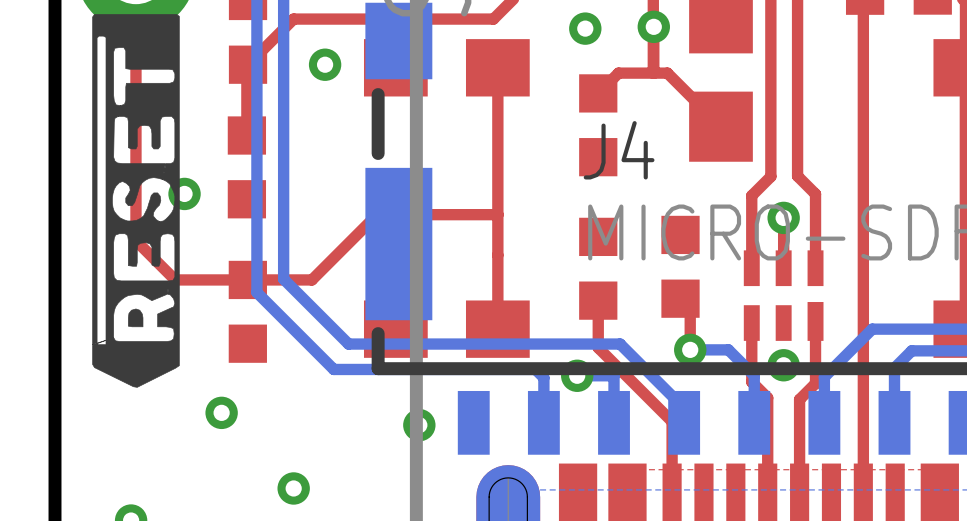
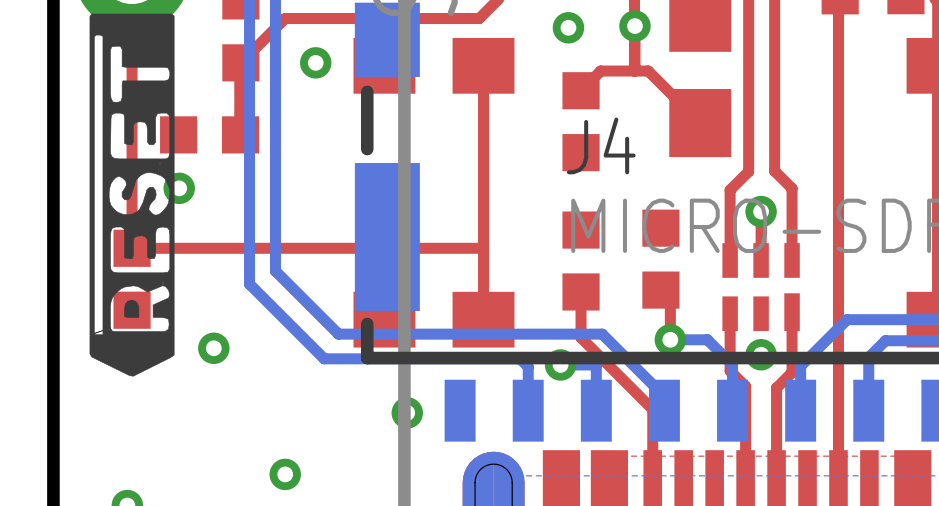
part rotation: 0° (246, 167) -> 90° clockwise (209, 134)
top track: (497, 214) (377, 214) (311, 279) (175, 279) (135, 240) -> (483, 248) (132, 248) (132, 233)
part position: (247, 311) -> (132, 279)
via position: (221, 412) -> (213, 348)

